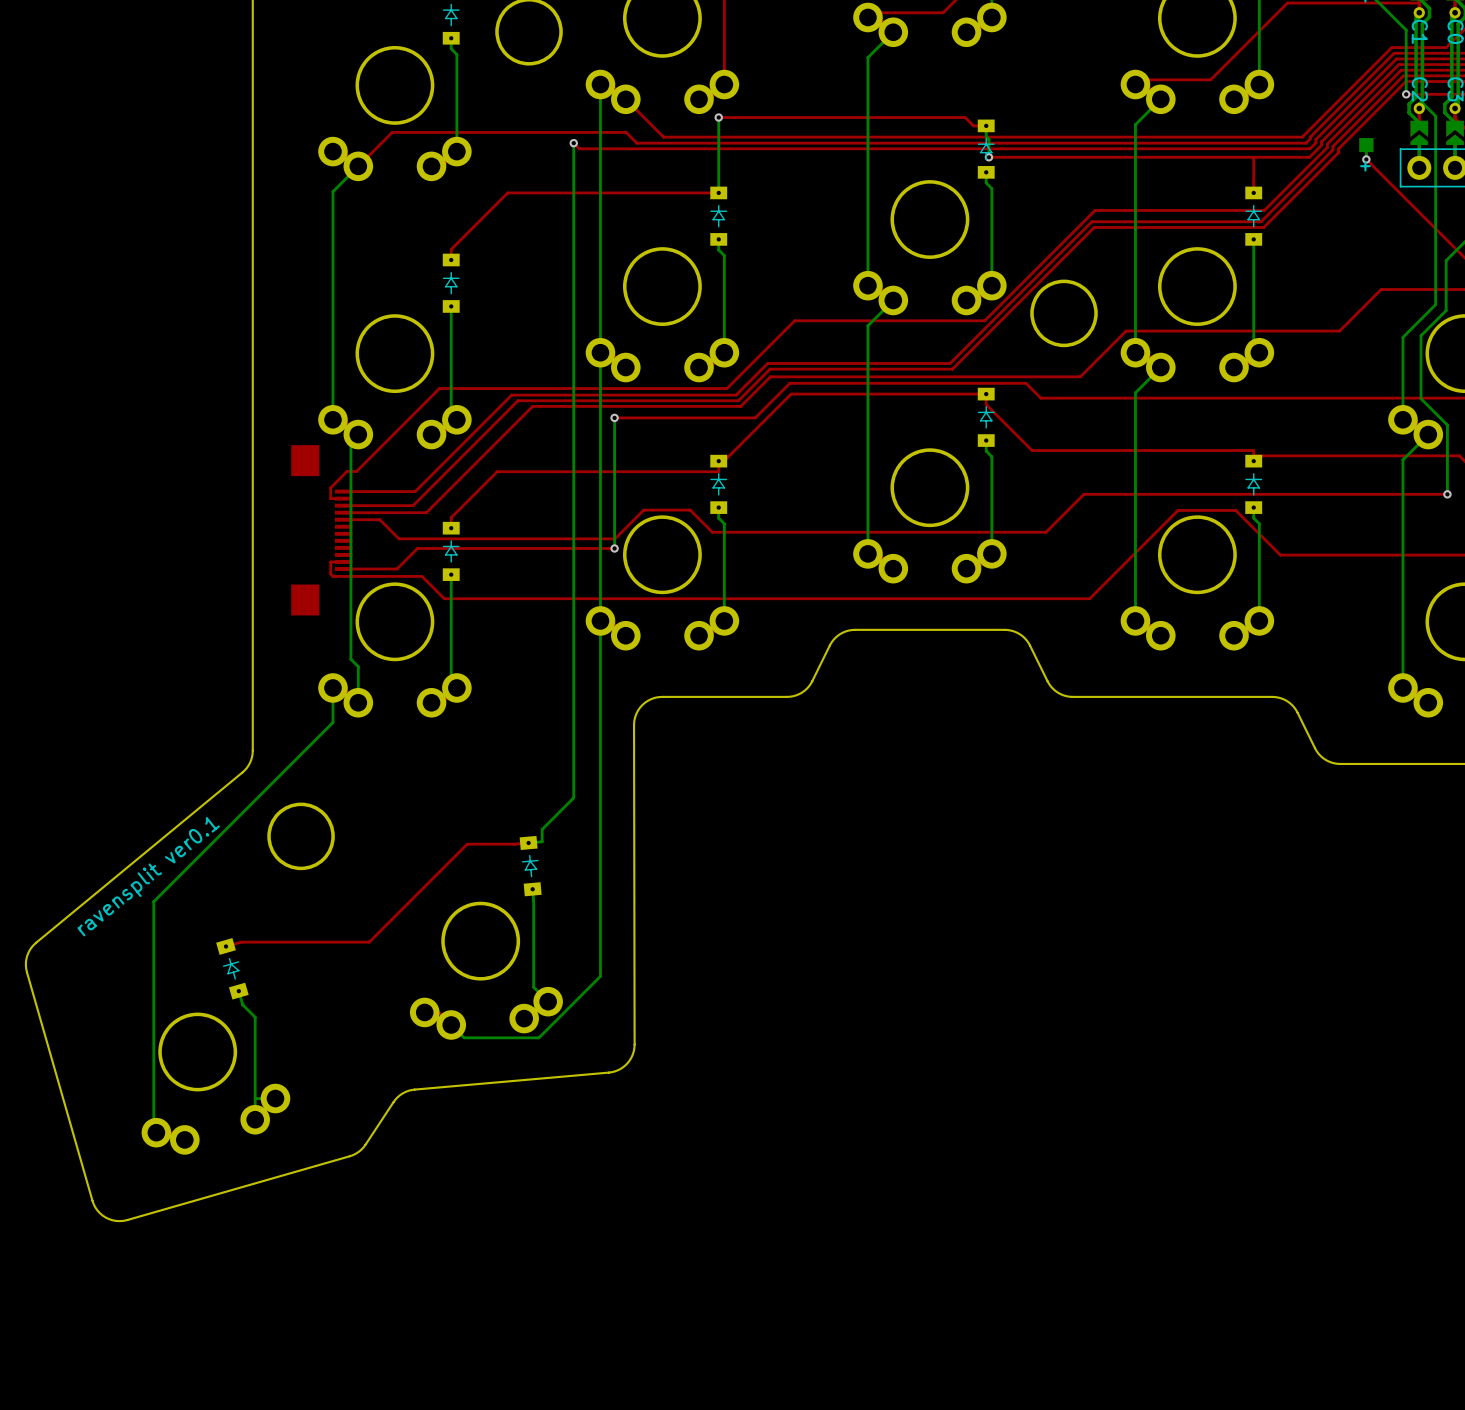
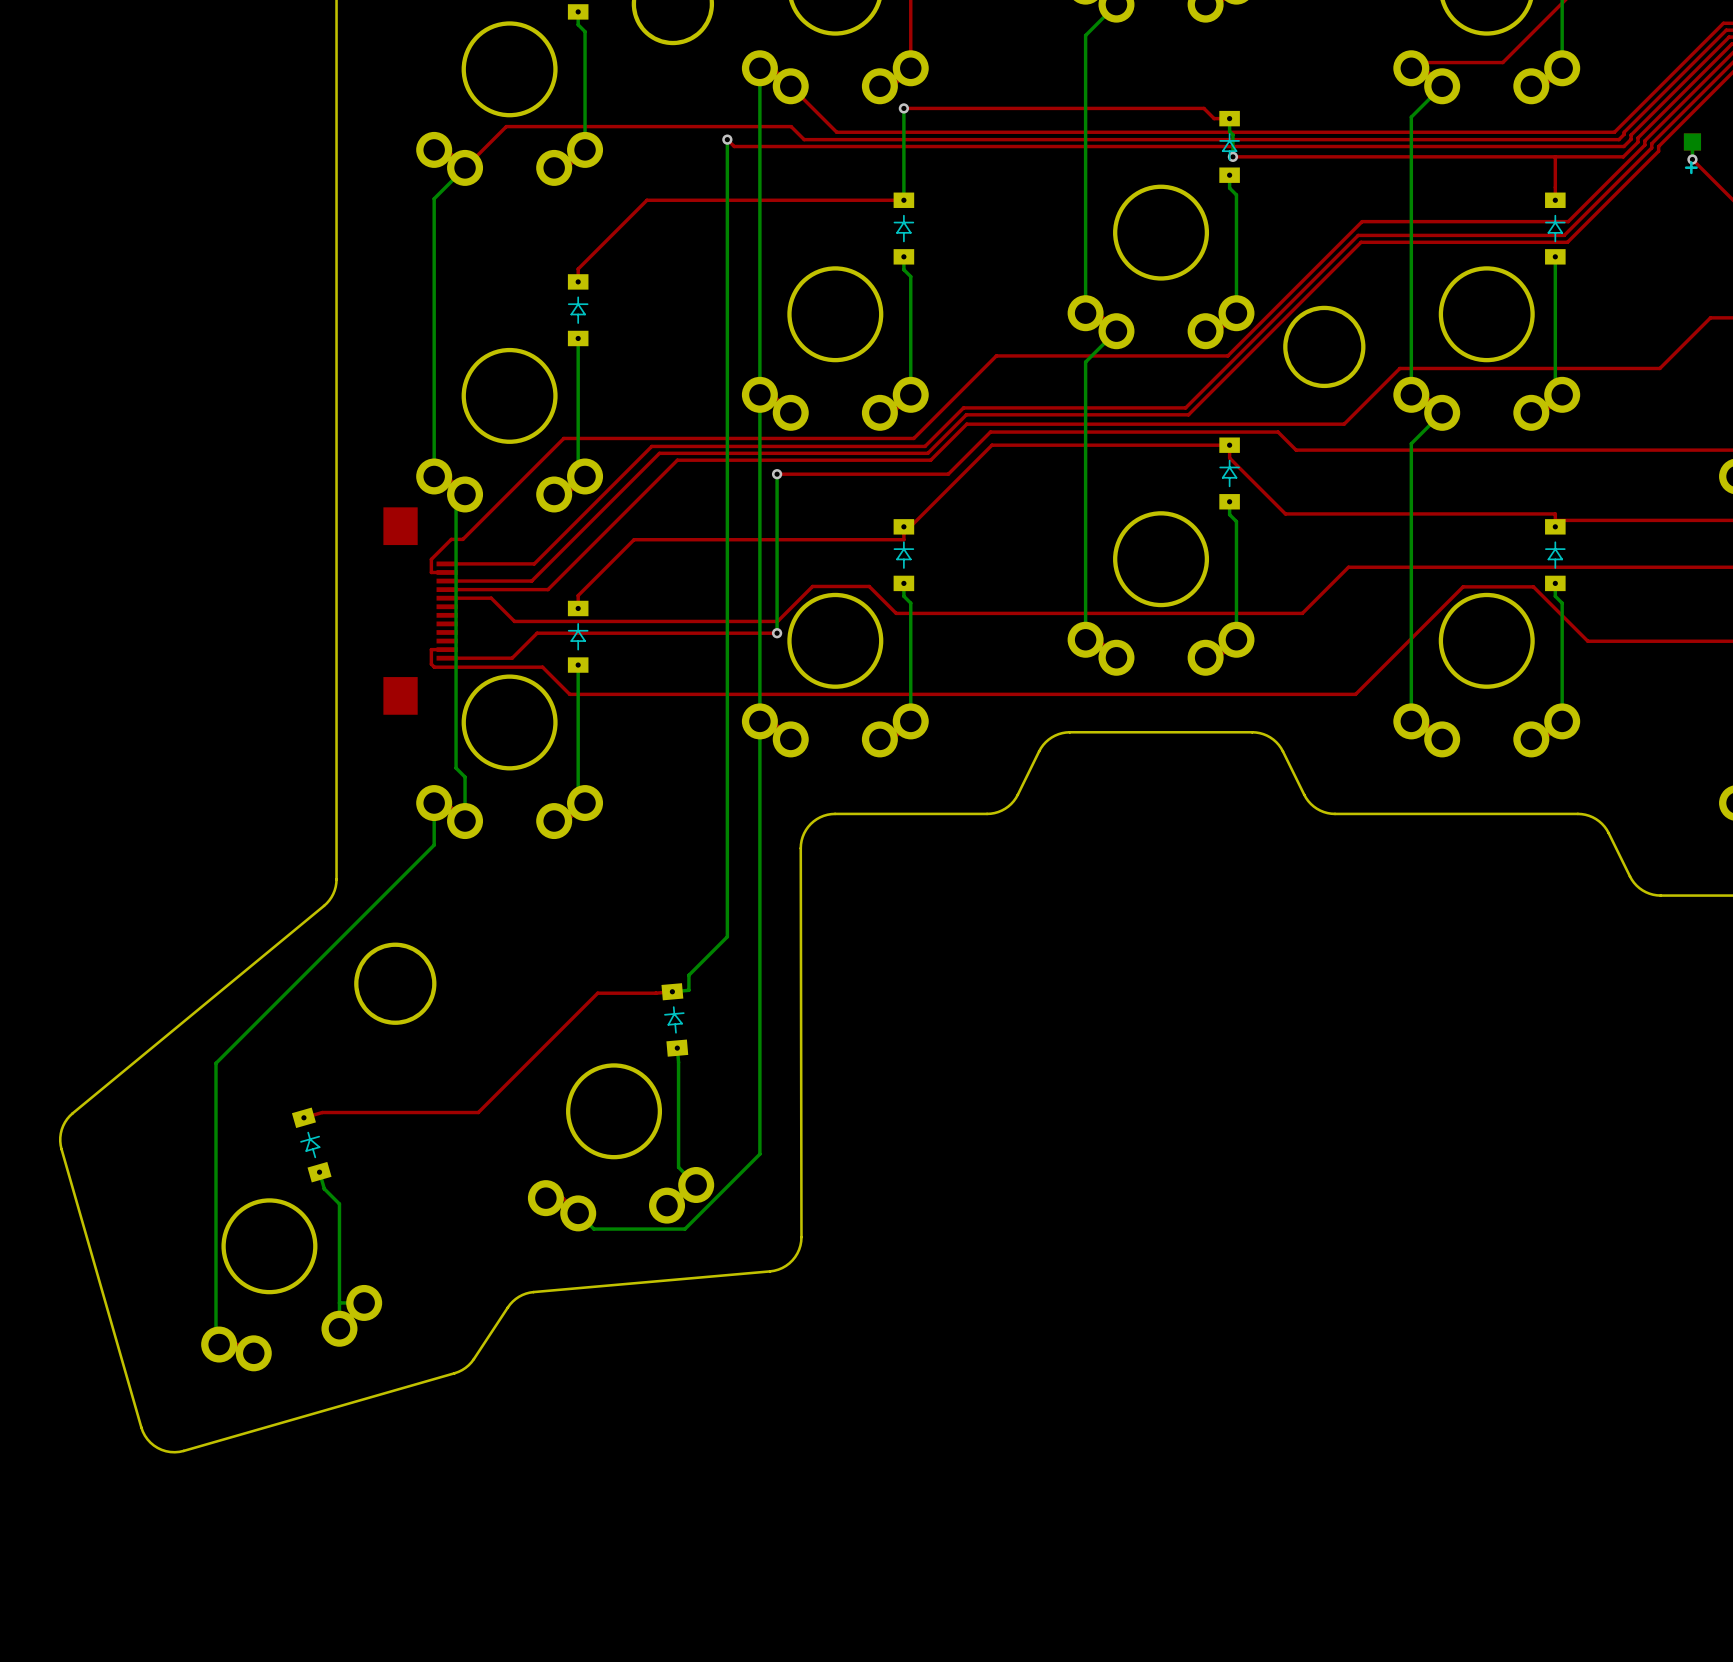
text: ravensplit ver0.1 (148, 876) -> none

